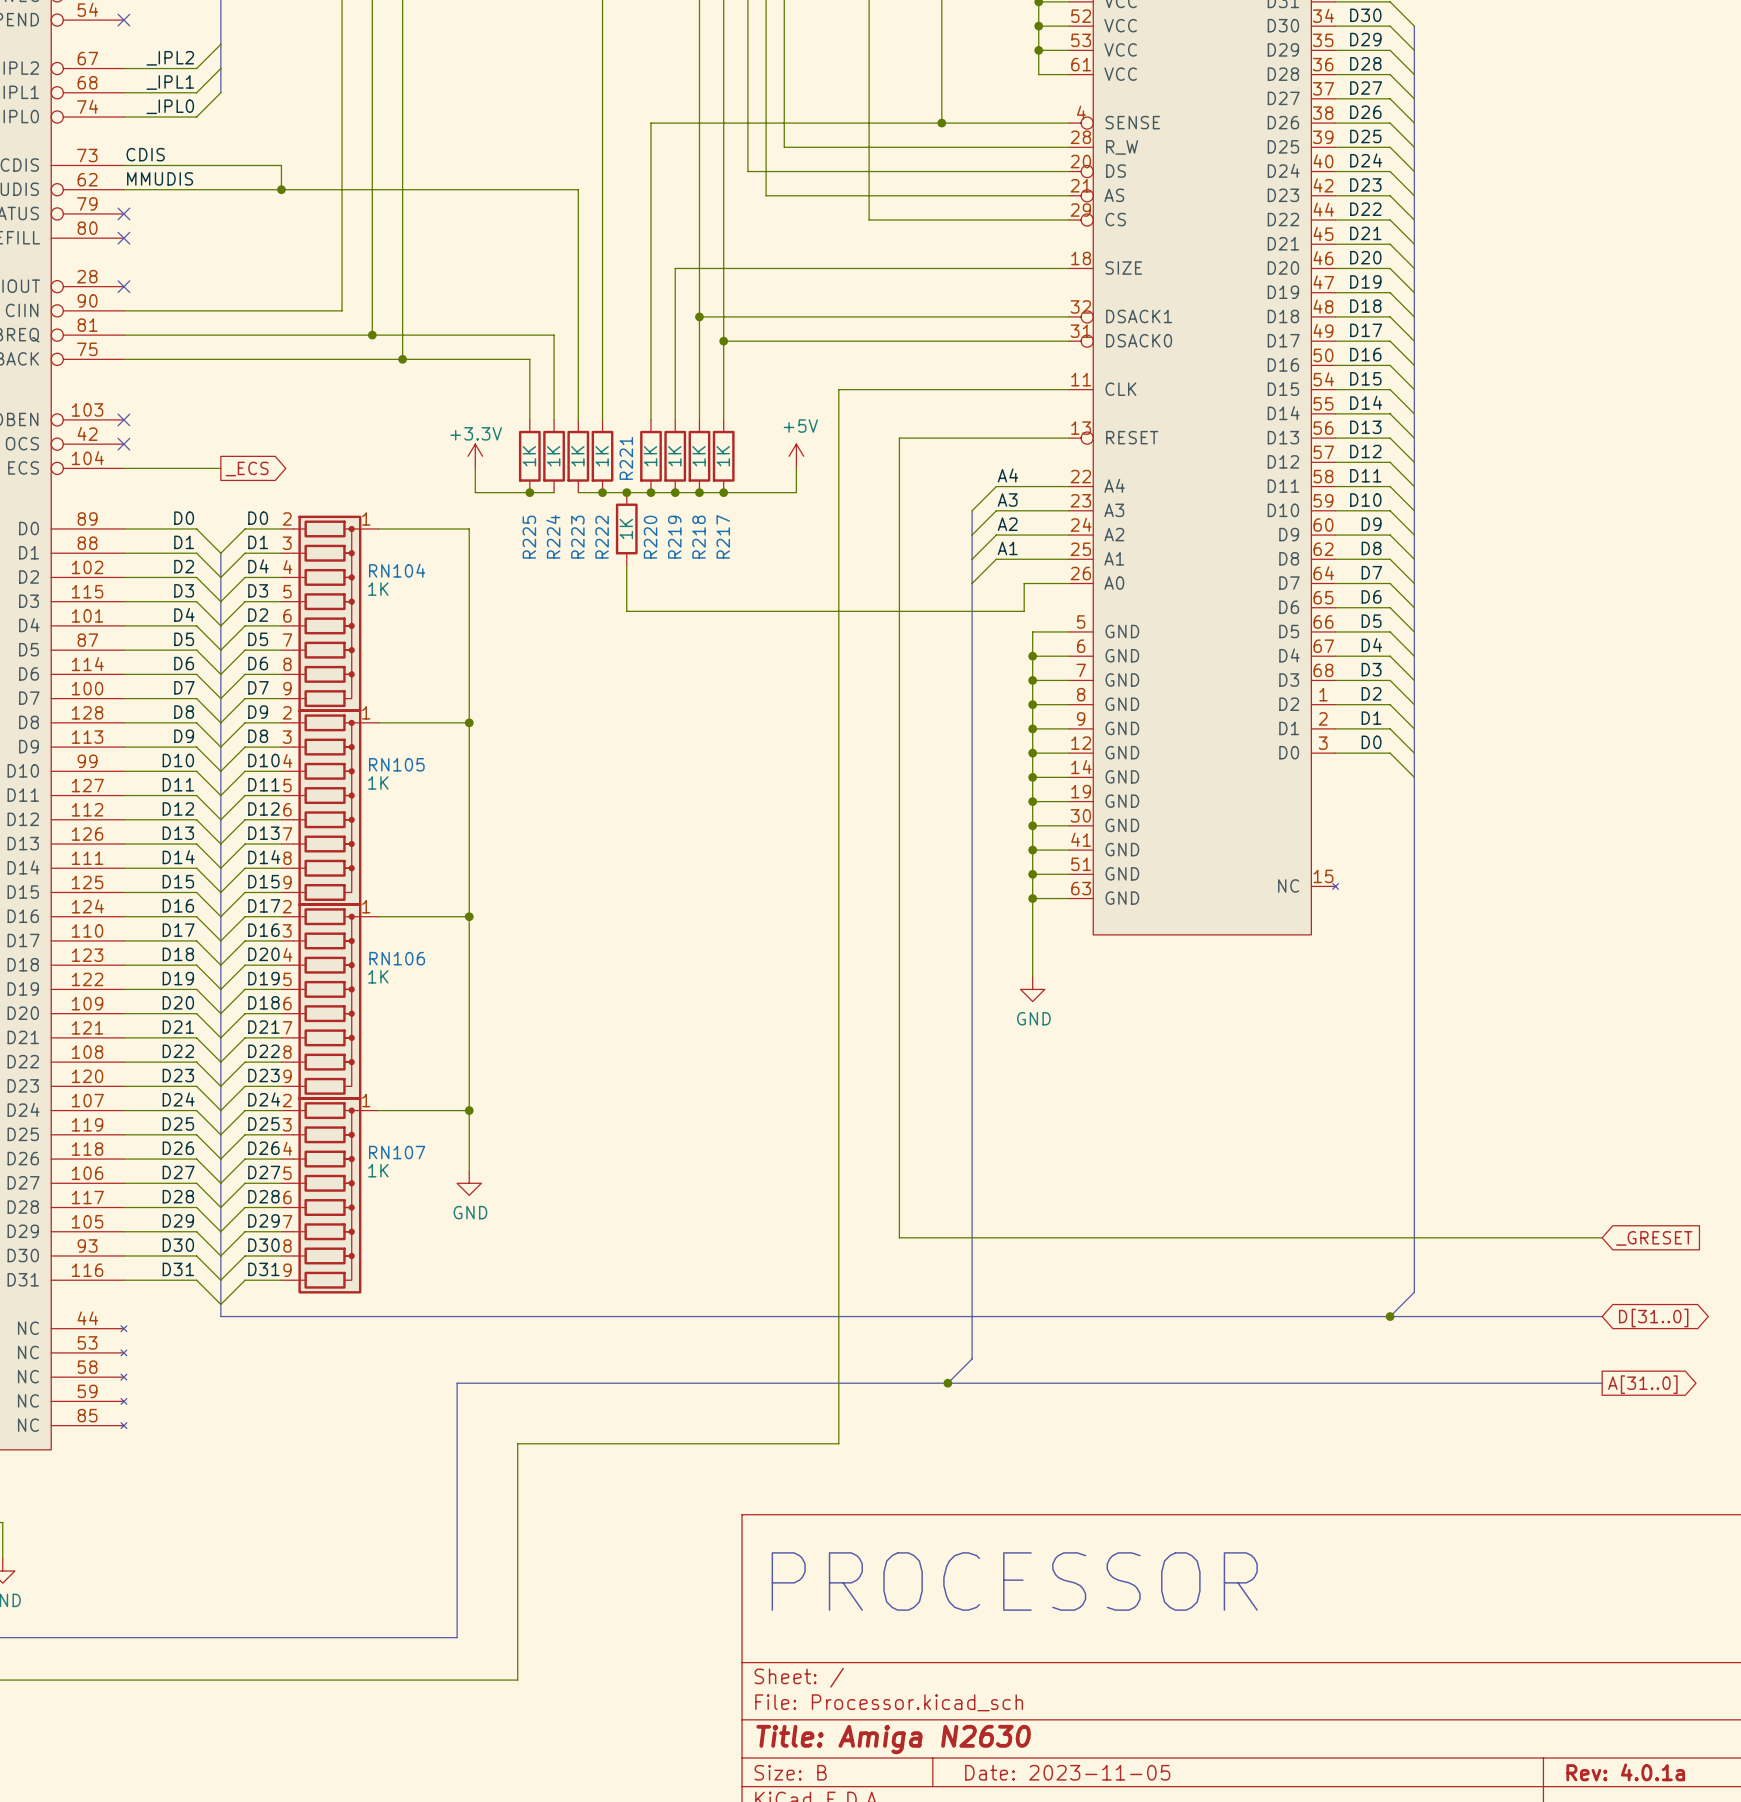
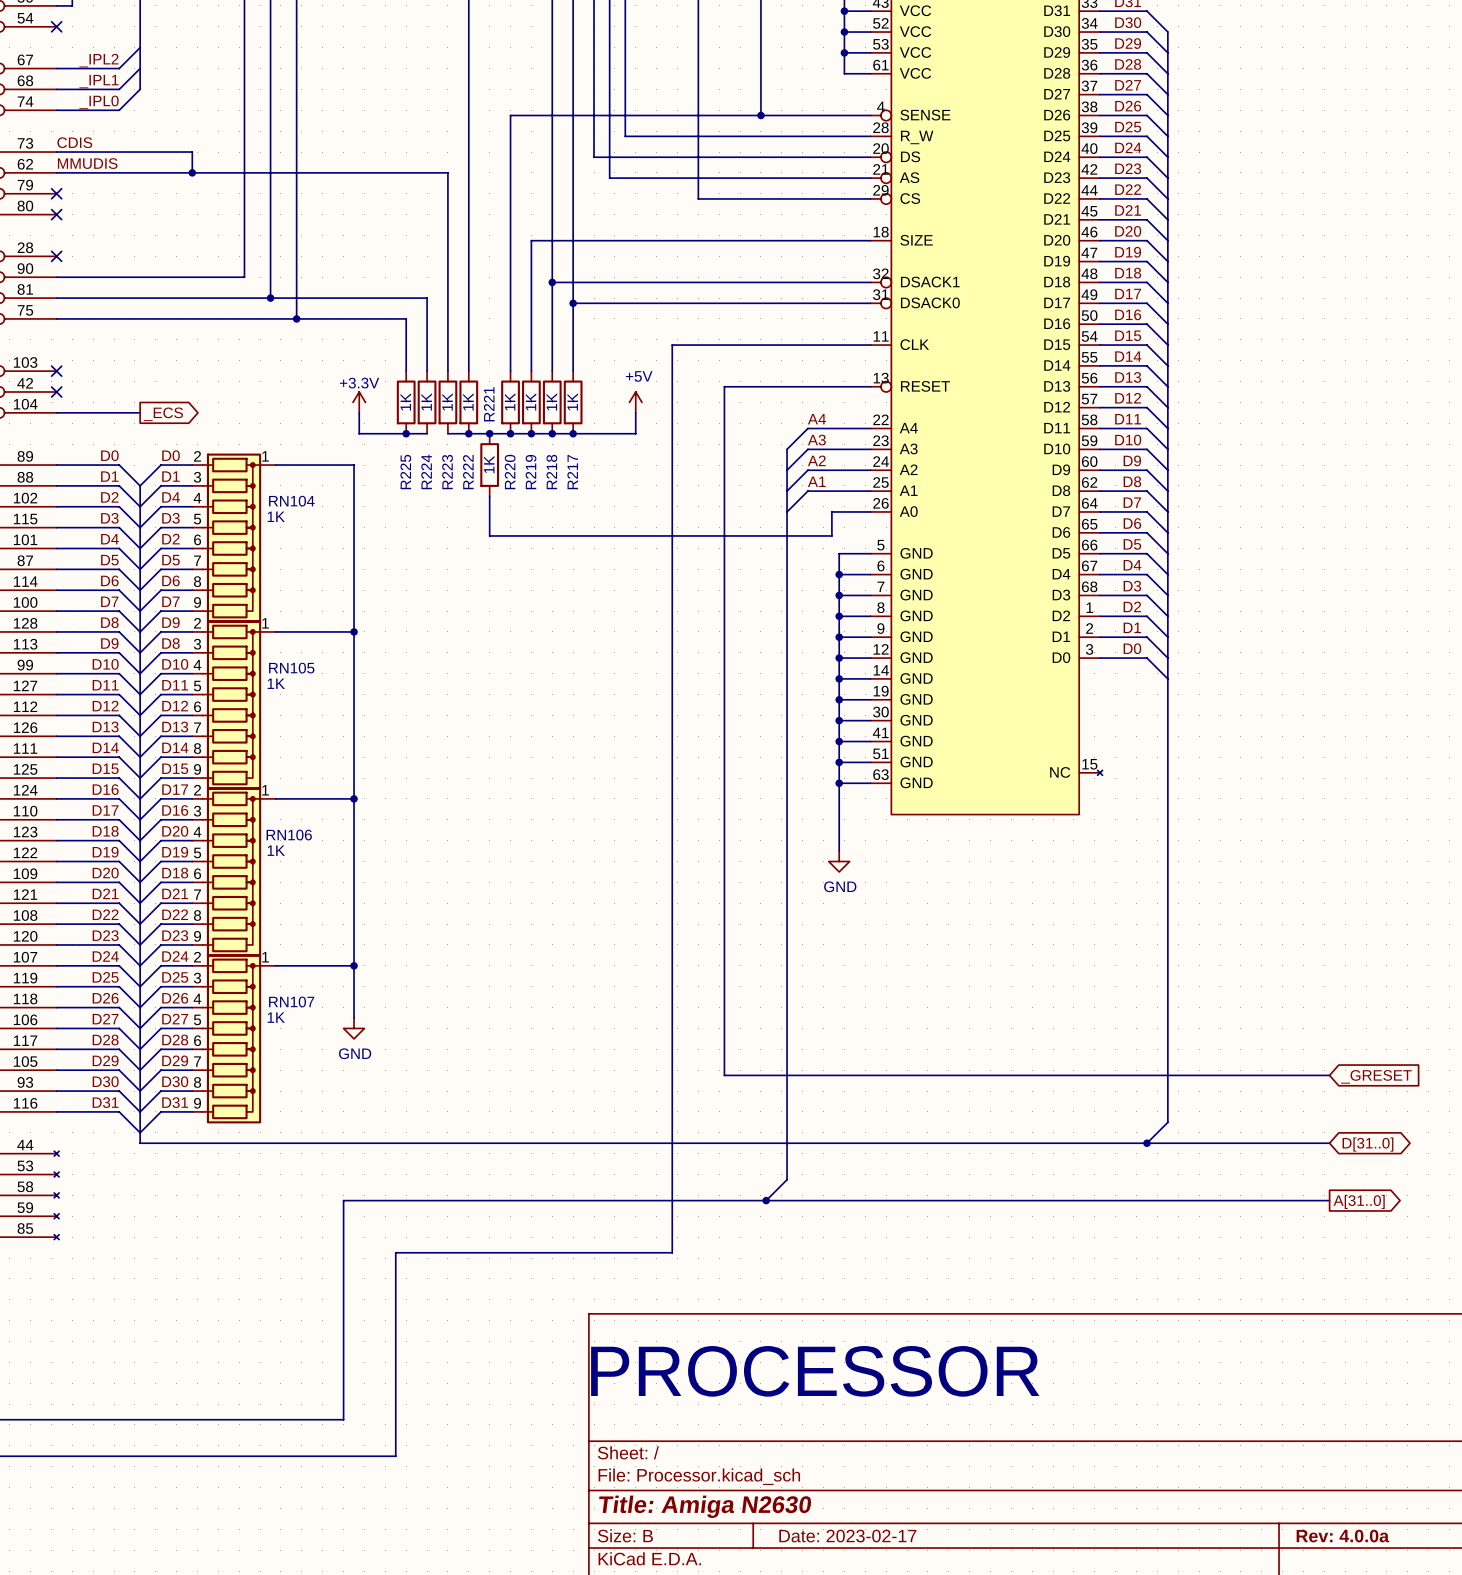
title block: Date: 2023-11-05 (1067, 1772) -> Date: 2023-02-17 (847, 1536)
title block: Rev: 4.0.1a (1625, 1772) -> Rev: 4.0.0a (1342, 1536)

